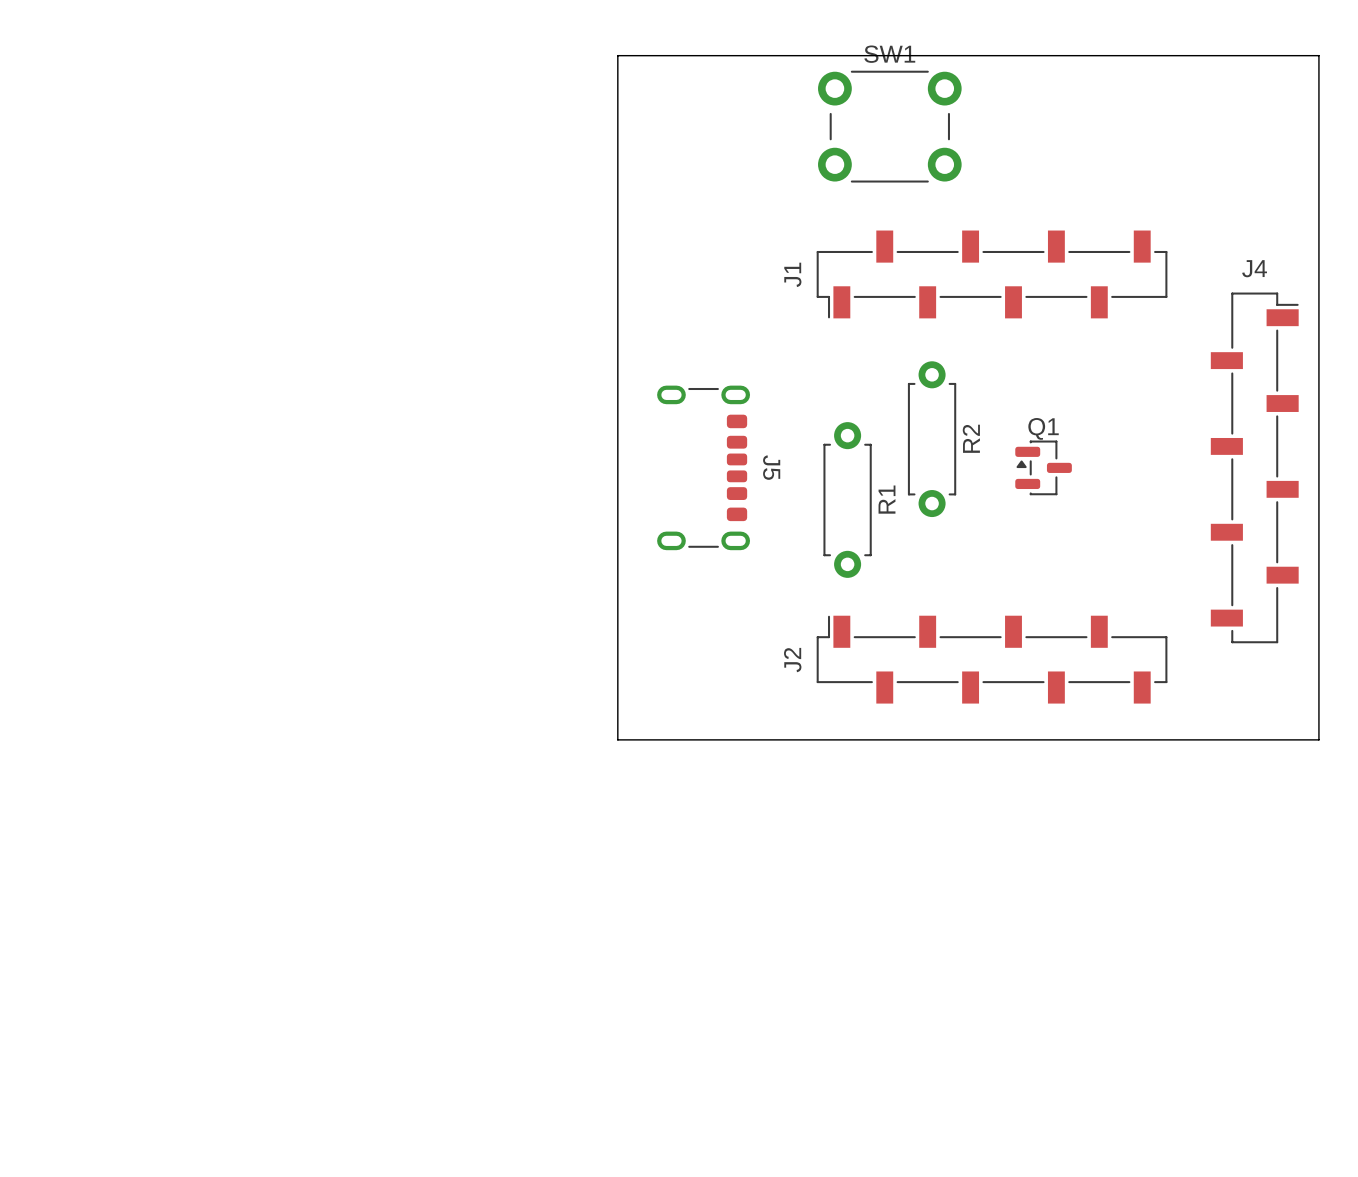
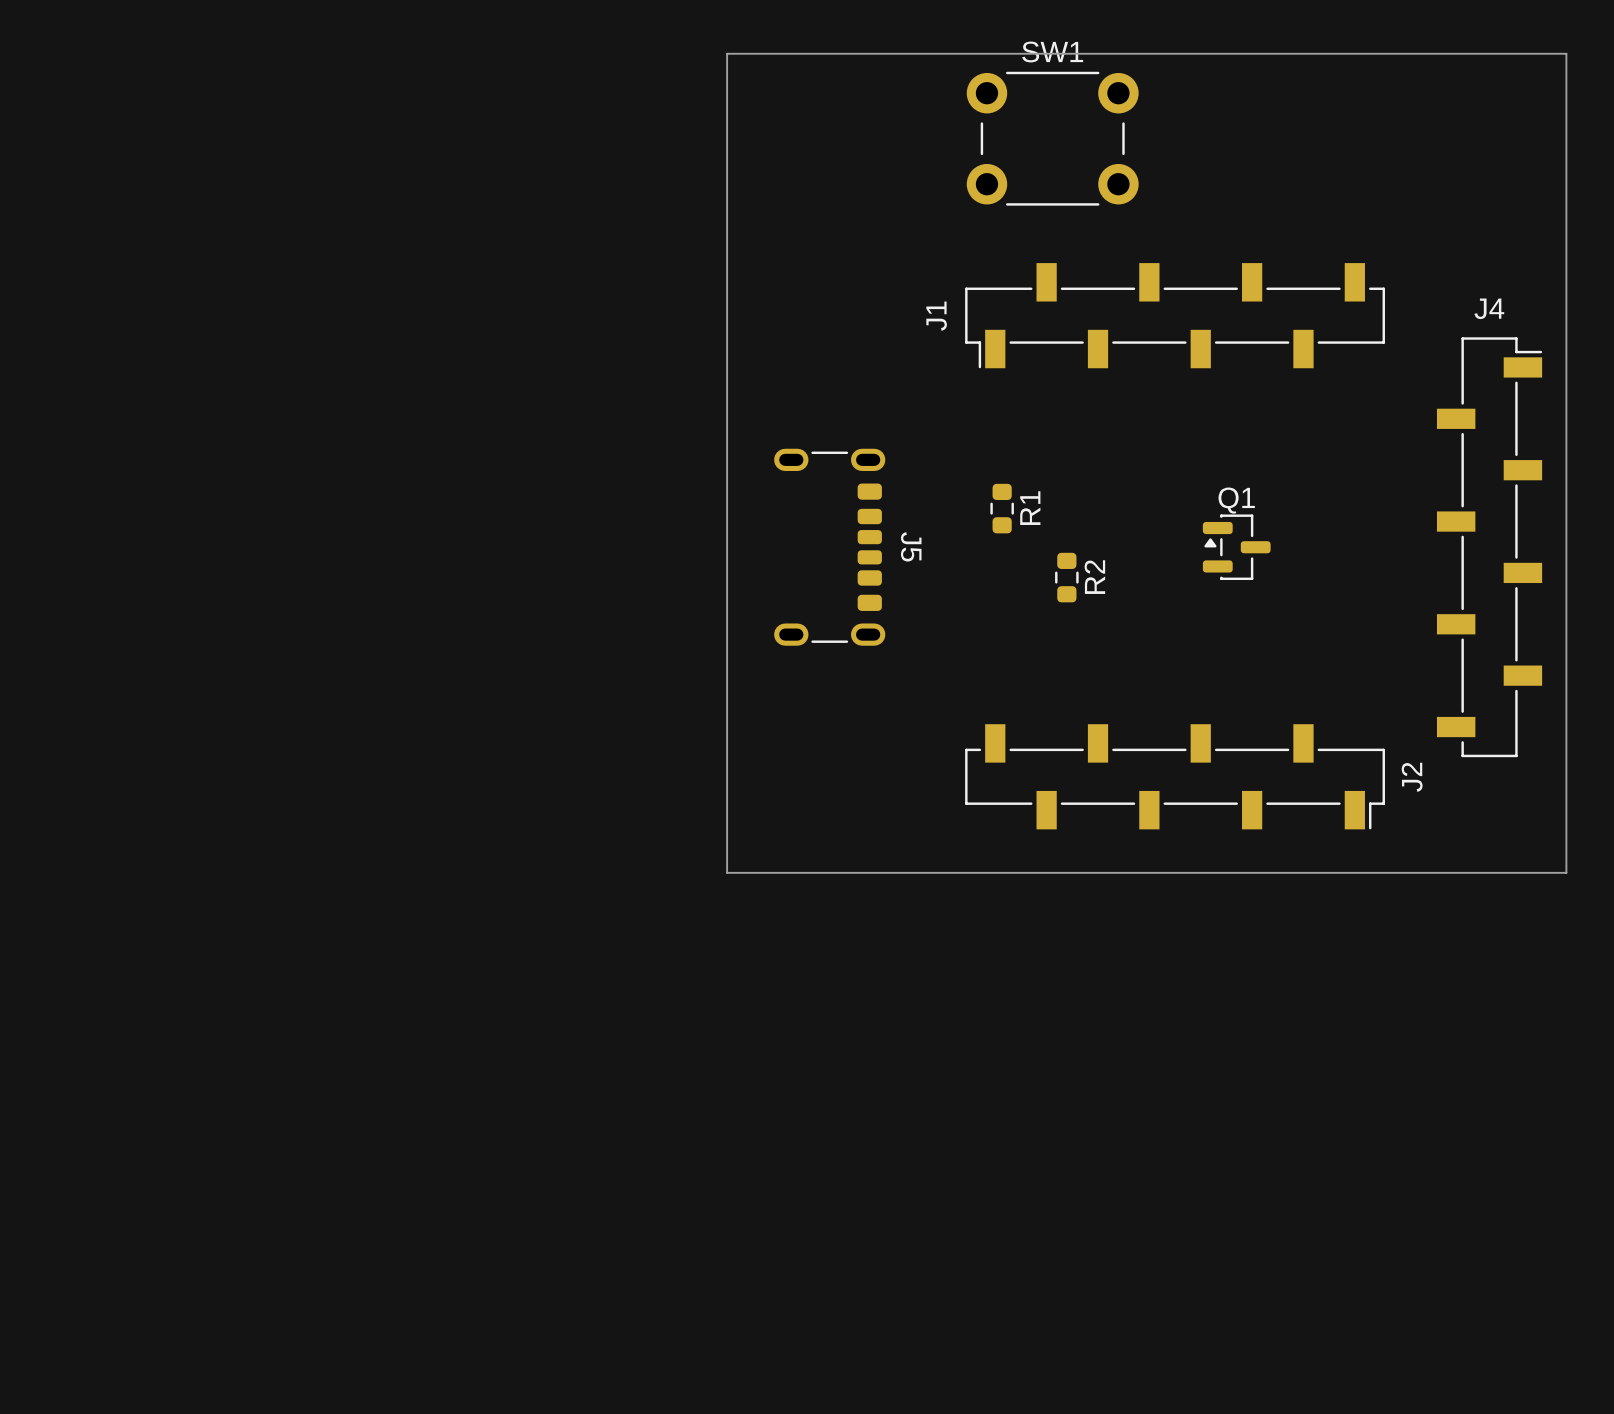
R2 footprint: [907, 361, 957, 518] -> [1055, 552, 1079, 603]
R1 footprint: [823, 422, 872, 578] -> [990, 483, 1014, 534]
J2 rotation: 0° (992, 659) -> 180° (1175, 776)

